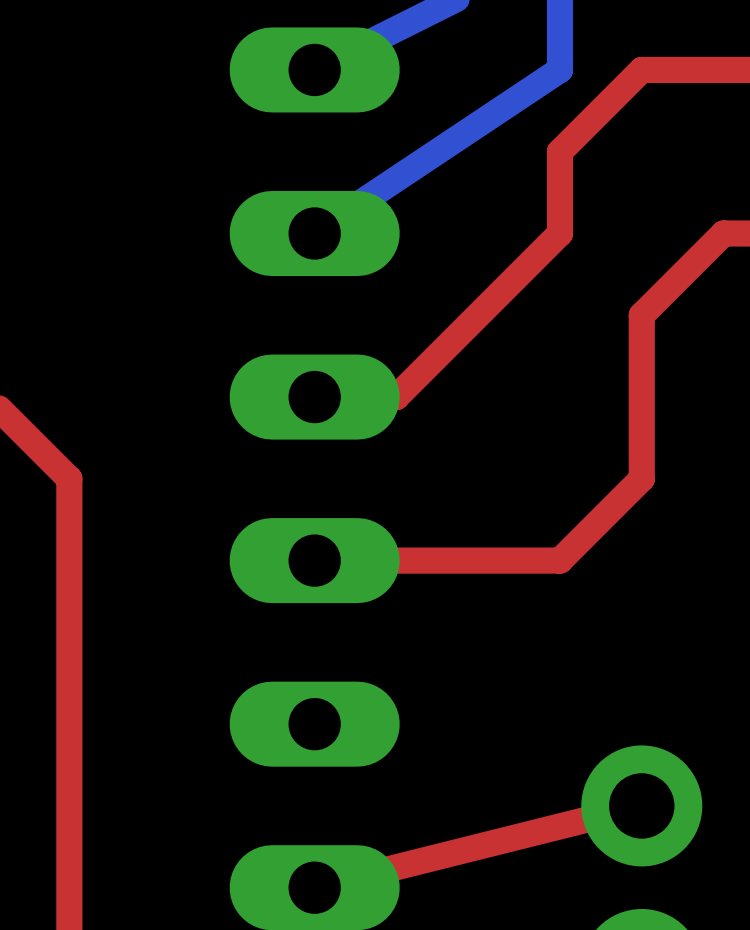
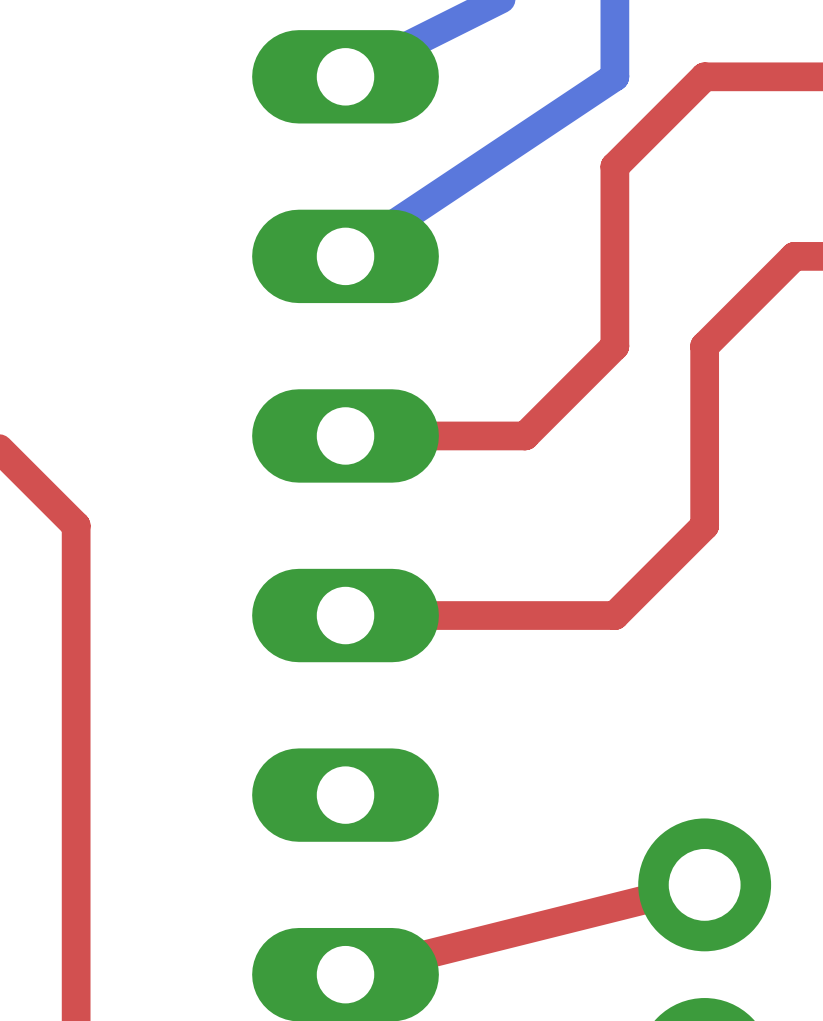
top track: (560, 233) (396, 397) -> (614, 256) (614, 346) (525, 435) (435, 435)

